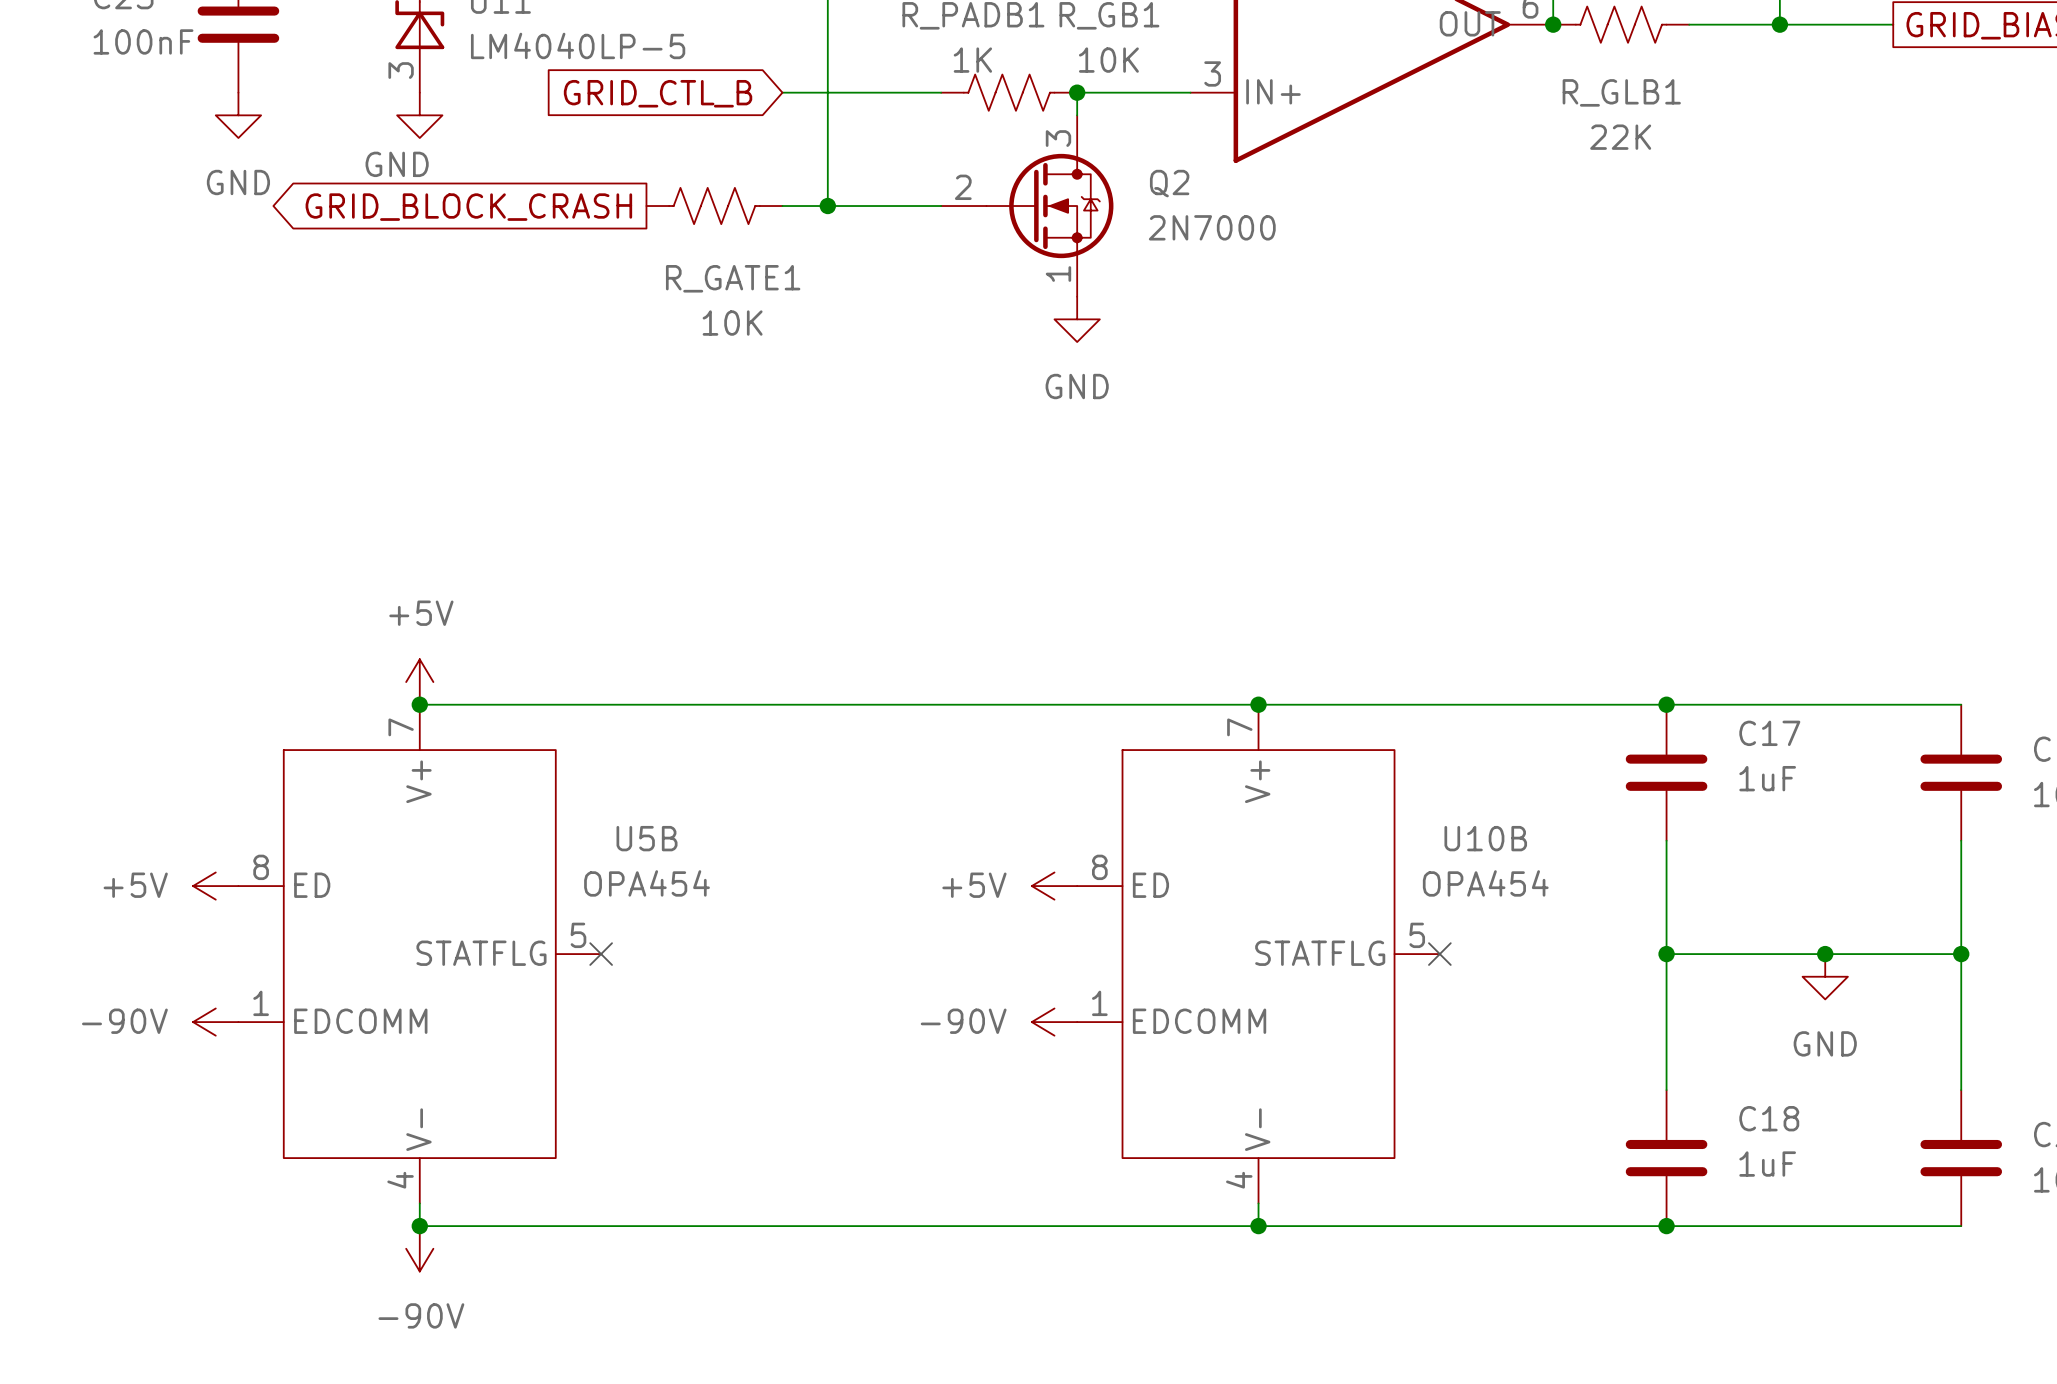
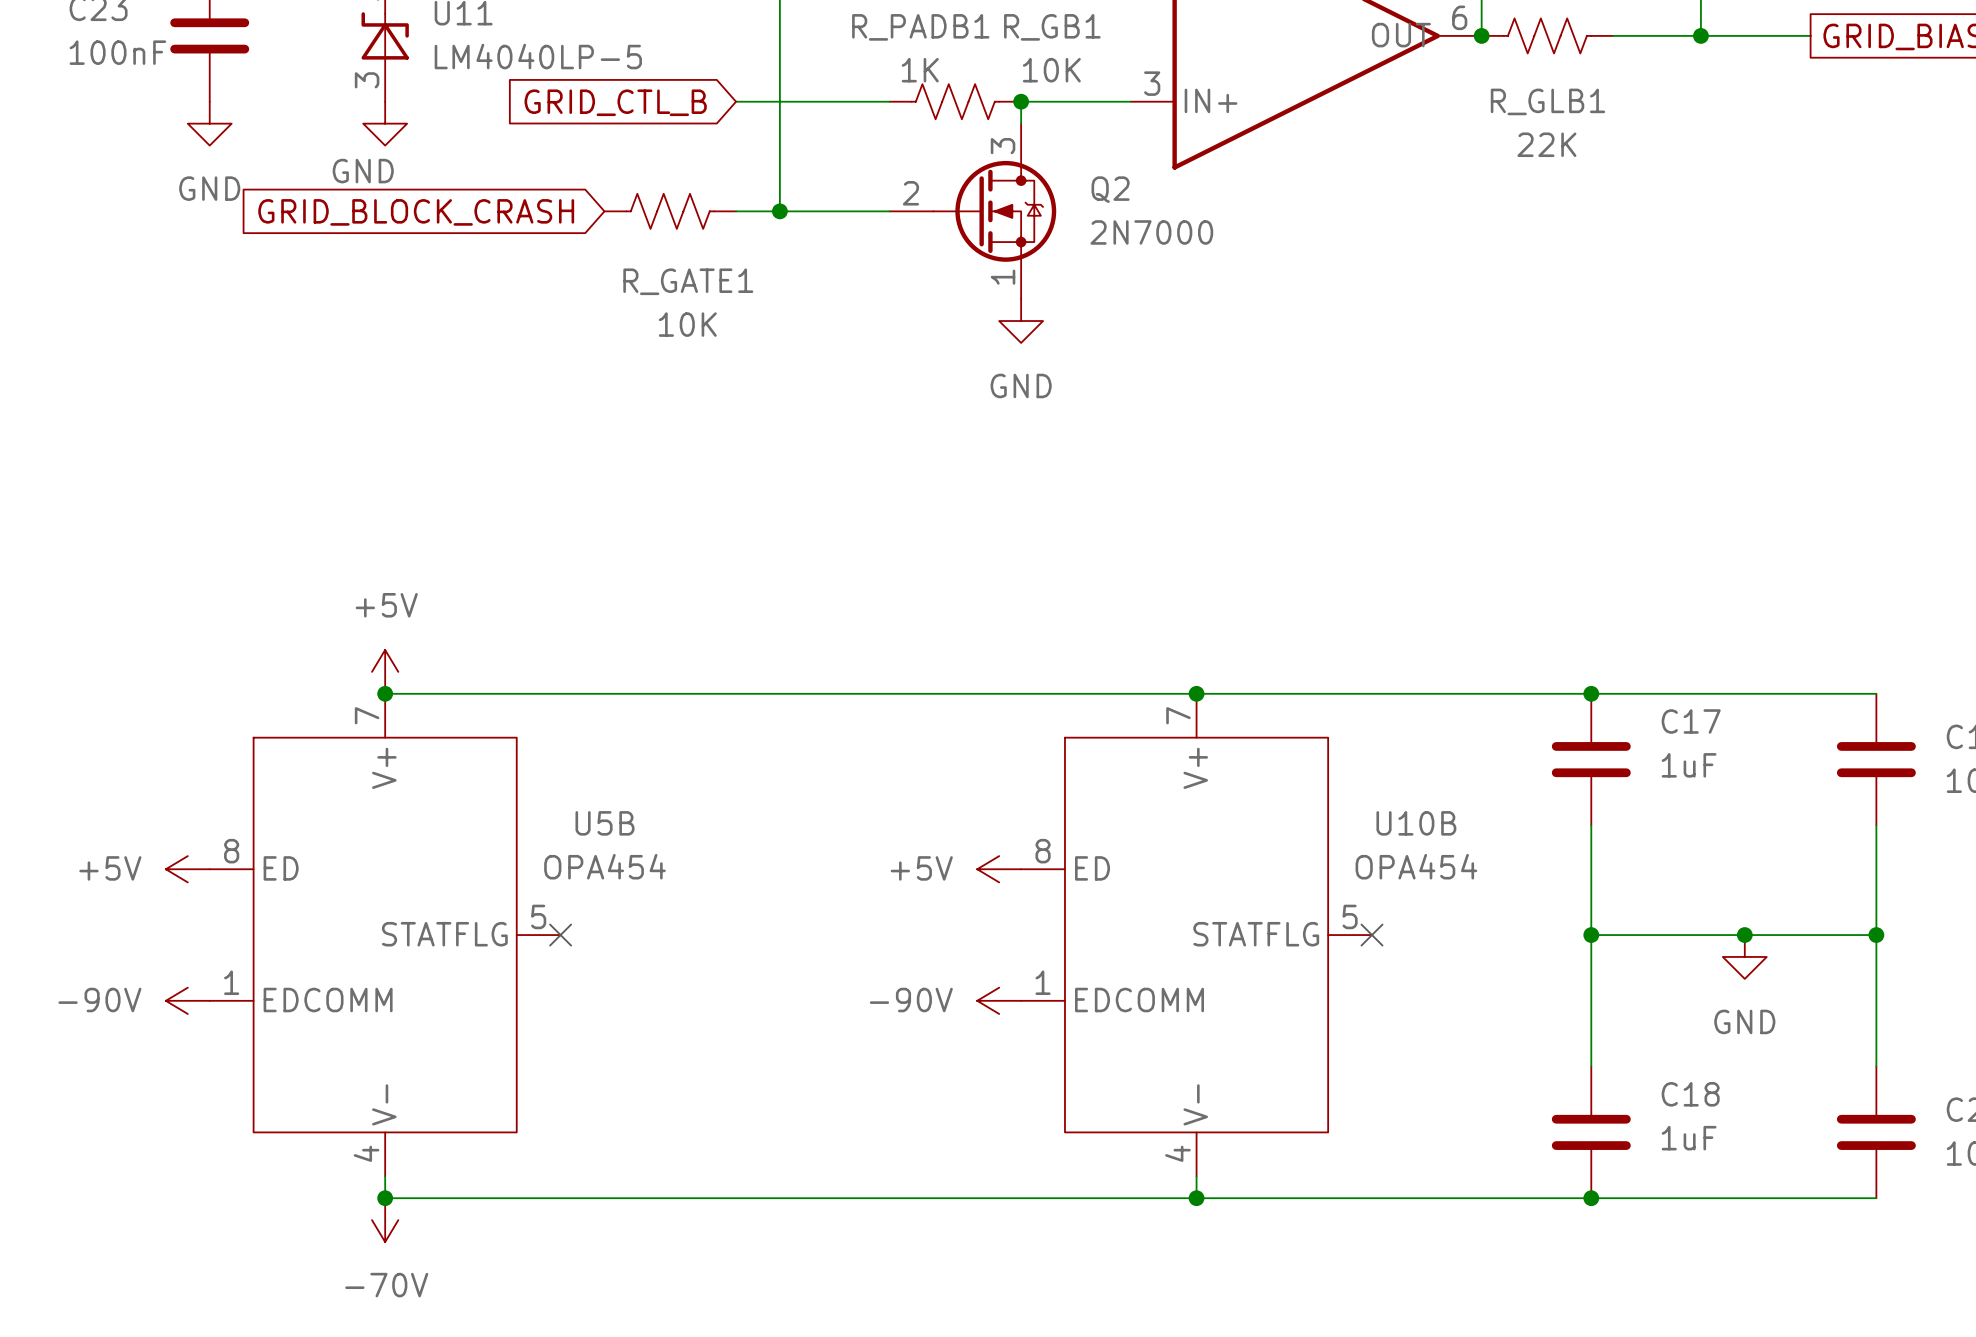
global label shape: output (468, 207) -> input (416, 212)
power symbol: -90V (419, 1248) -> -70V (385, 1220)

